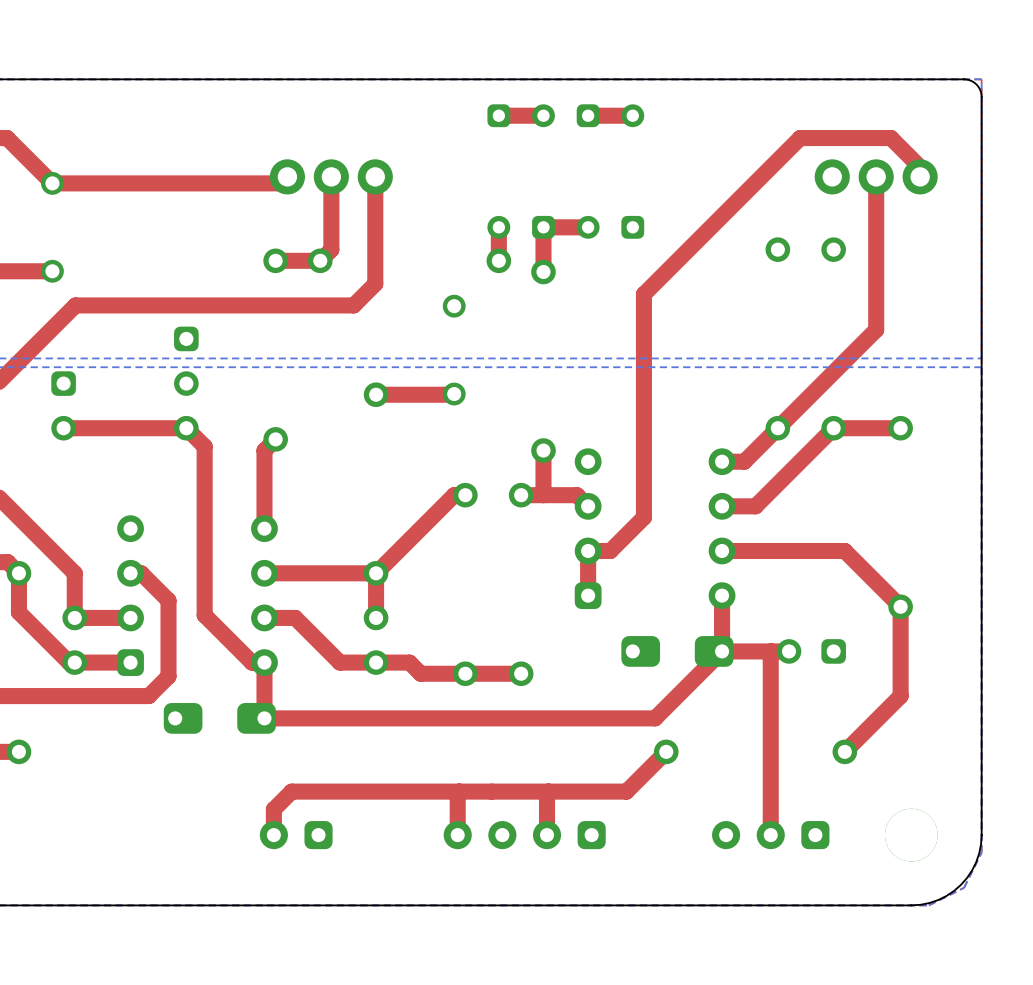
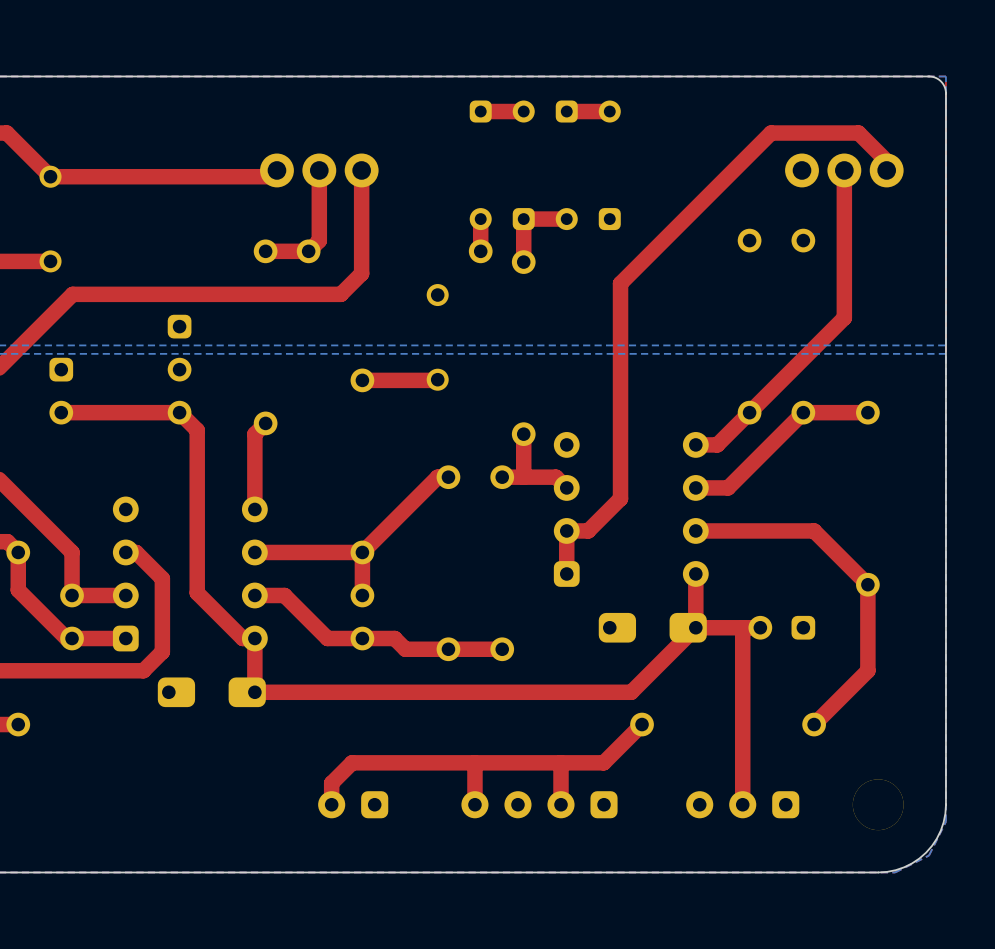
top track: (365, 791) (291, 791) (273, 809) (273, 835) -> (352, 762) (331, 783) (331, 804)
top track: (459, 791) (457, 835) -> none
top track: none -> (474, 762) (474, 804)
top track: (548, 791) (547, 835) -> none
top track: none -> (560, 762) (561, 804)
part position: (296, 835) -> (353, 804)
part position: (524, 835) -> (539, 804)

